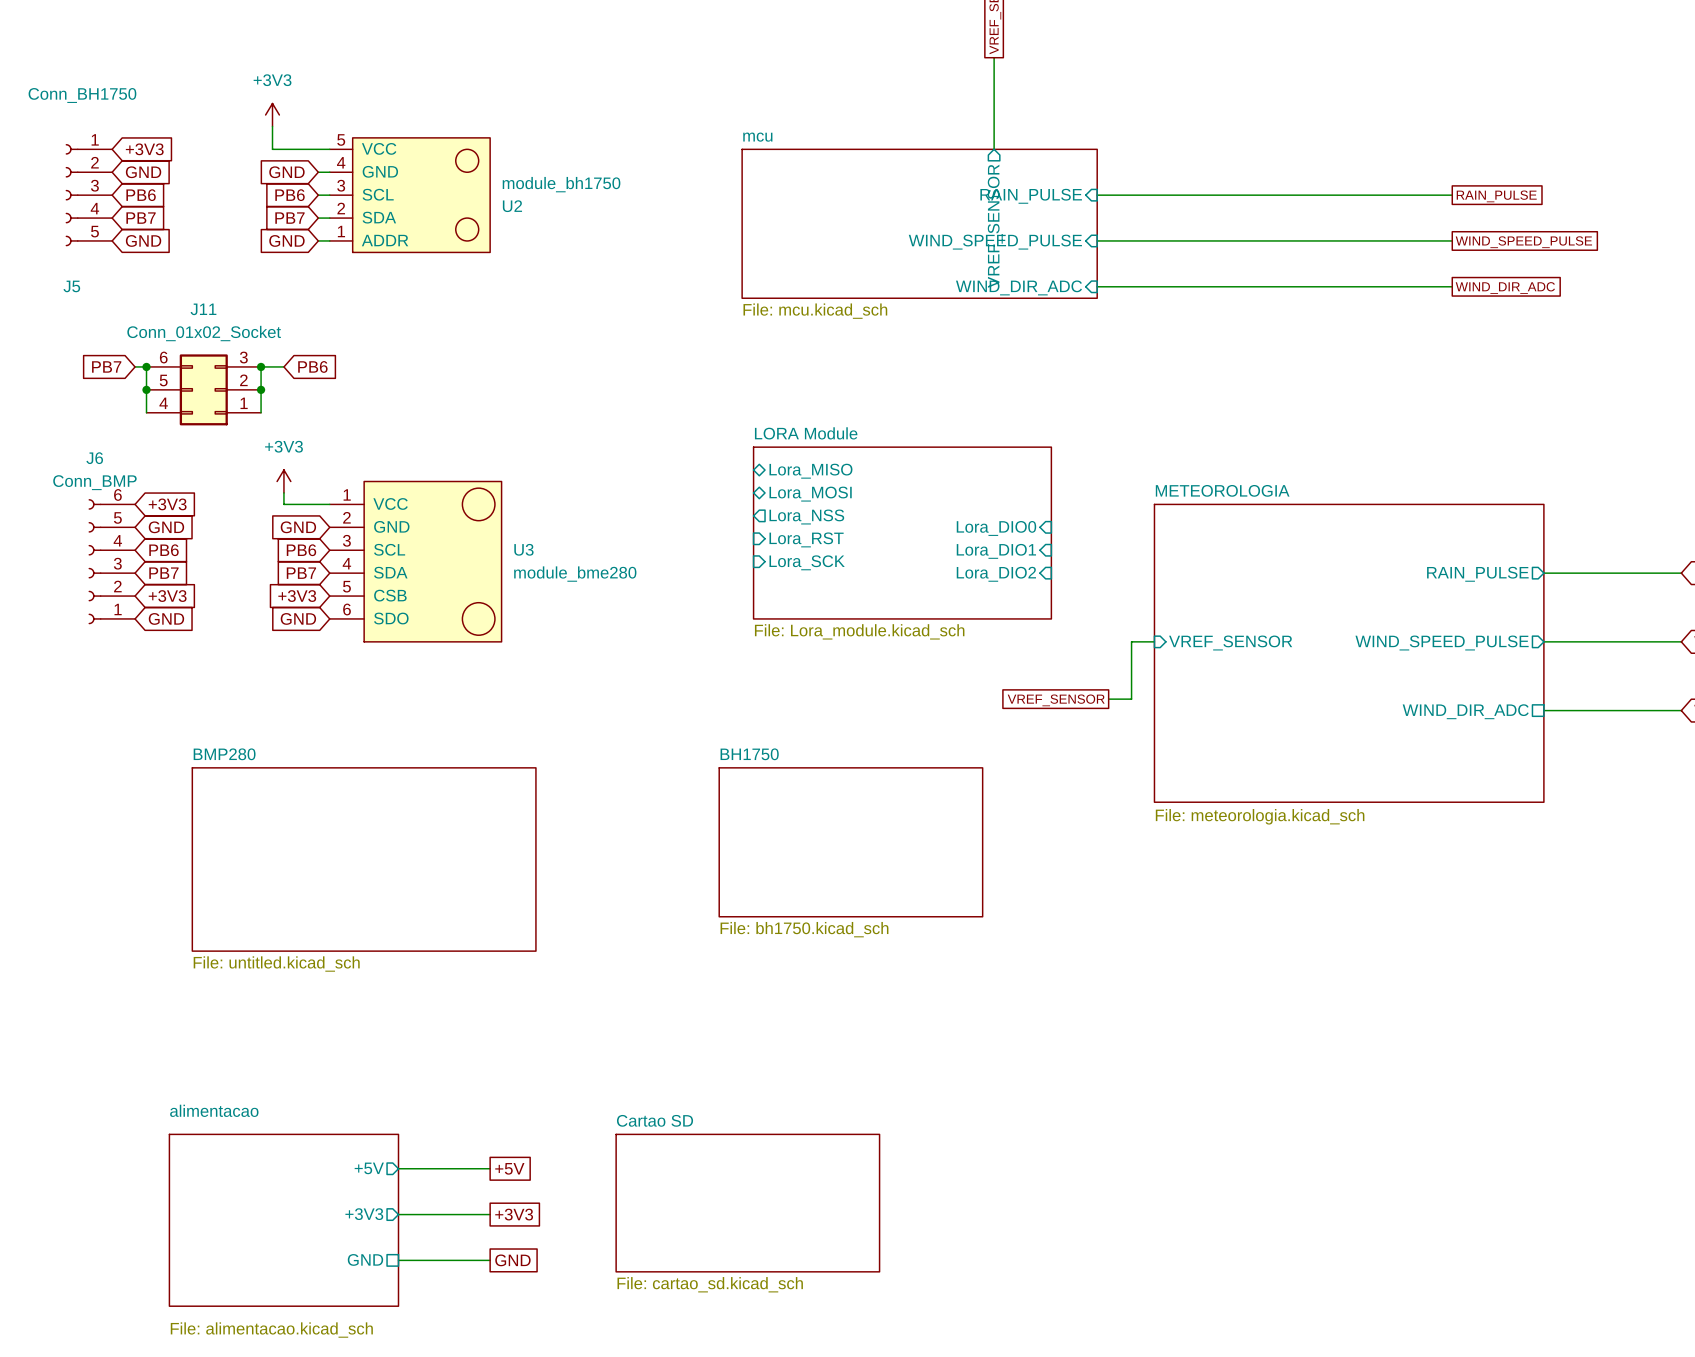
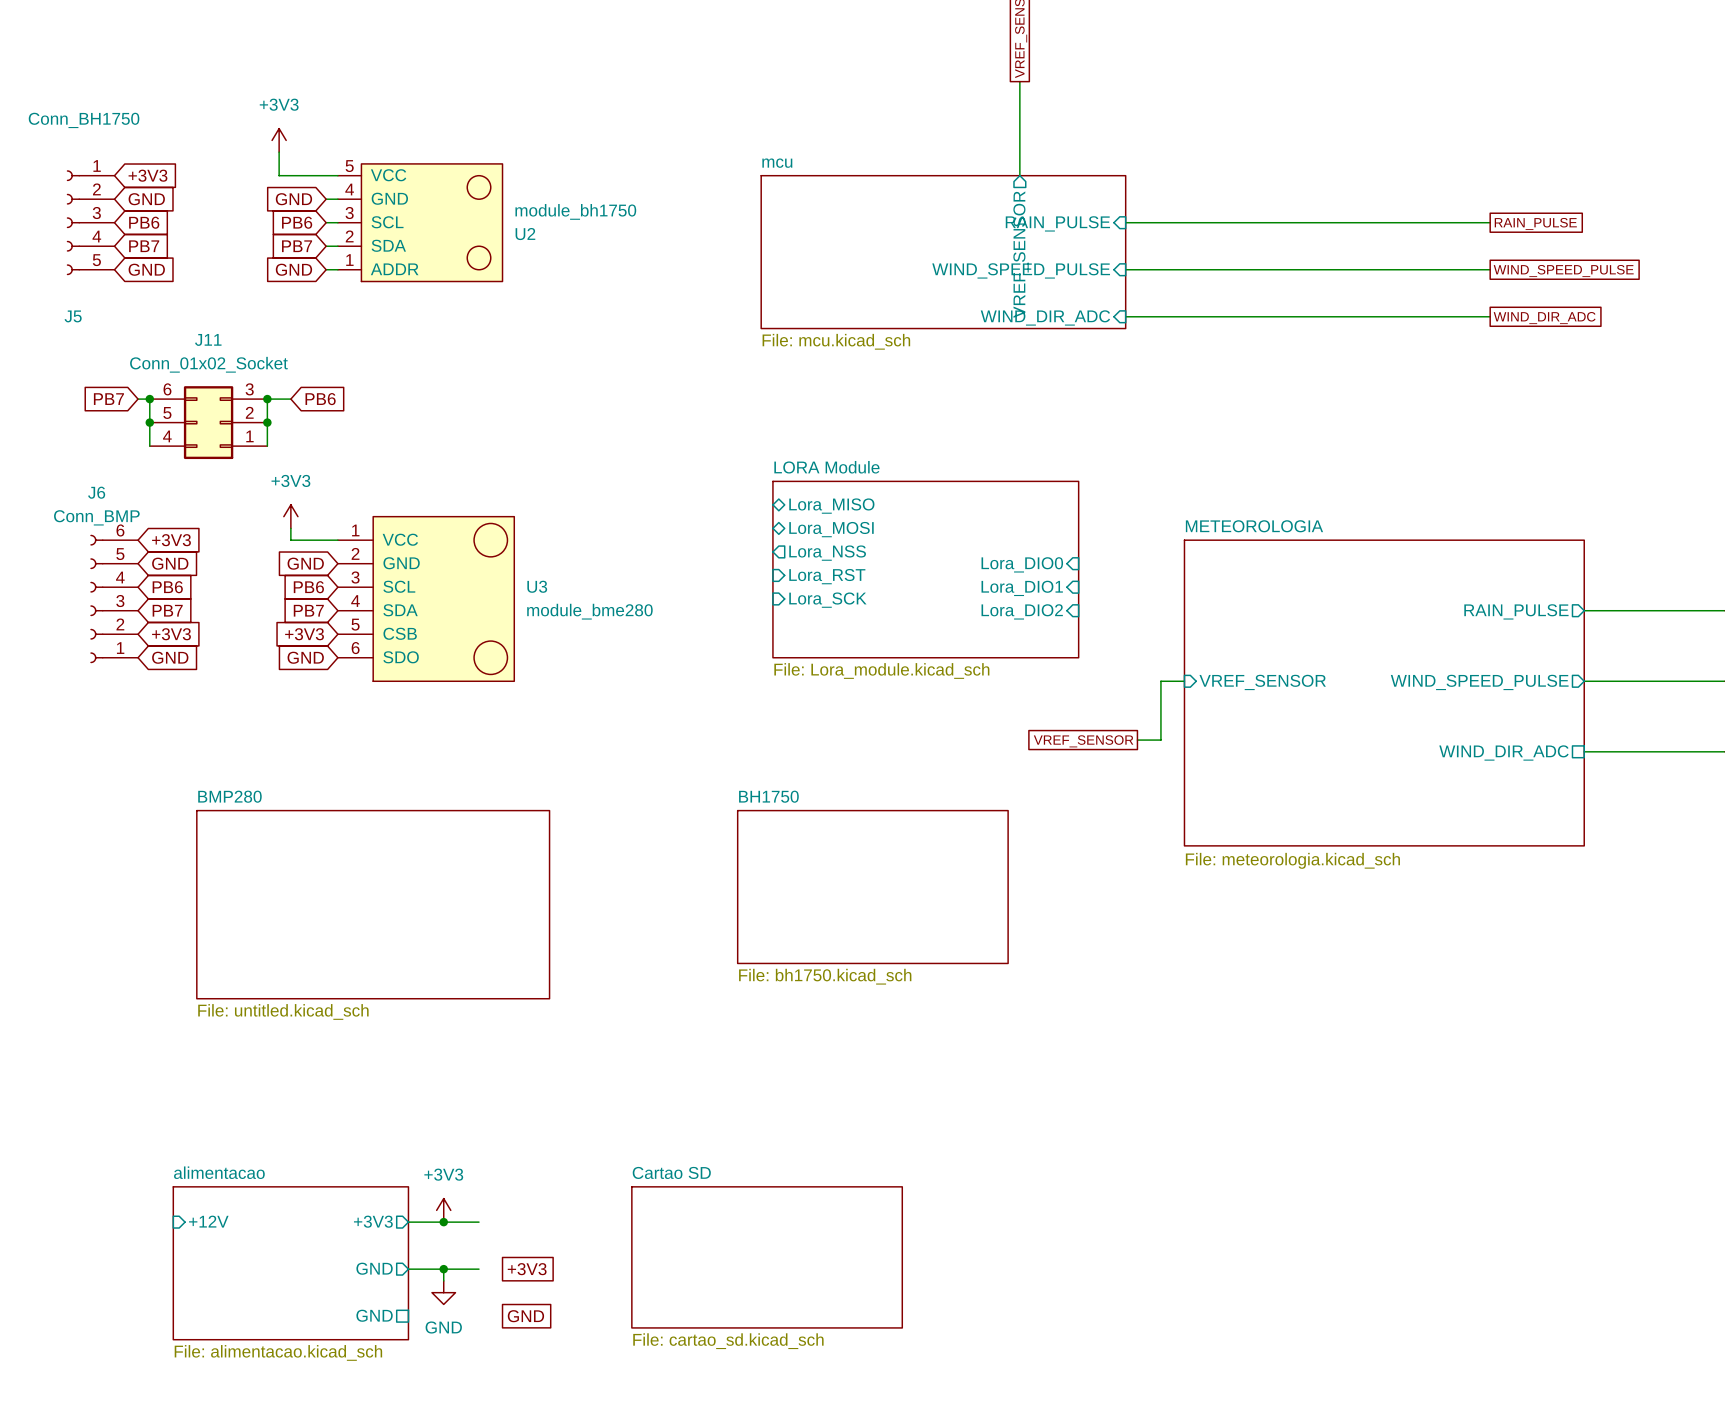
power symbol: none -> +3V3 (443, 1210)
sheet pin: none -> +12V (208, 1221)
sheet pin: +5V (369, 1168) -> +3V3 (373, 1221)
junction: none -> (443, 1222)
wire: (467, 1168) (490, 1168) -> none
global label: +5V (509, 1168) -> none
sheet alimentacao: none -> File: alimentacao.kicad_sch (290, 1263)
sheet pin: +3V3 (364, 1214) -> GND (374, 1268)
wire: none -> (443, 1269) (443, 1280)
junction: none -> (443, 1269)
wire: (467, 1214) (490, 1214) -> none
sheet alimentacao: File: alimentacao.kicad_sch (283, 1220) -> none
power symbol: none -> GND (443, 1292)
wire: (398, 1260) (490, 1260) -> none

